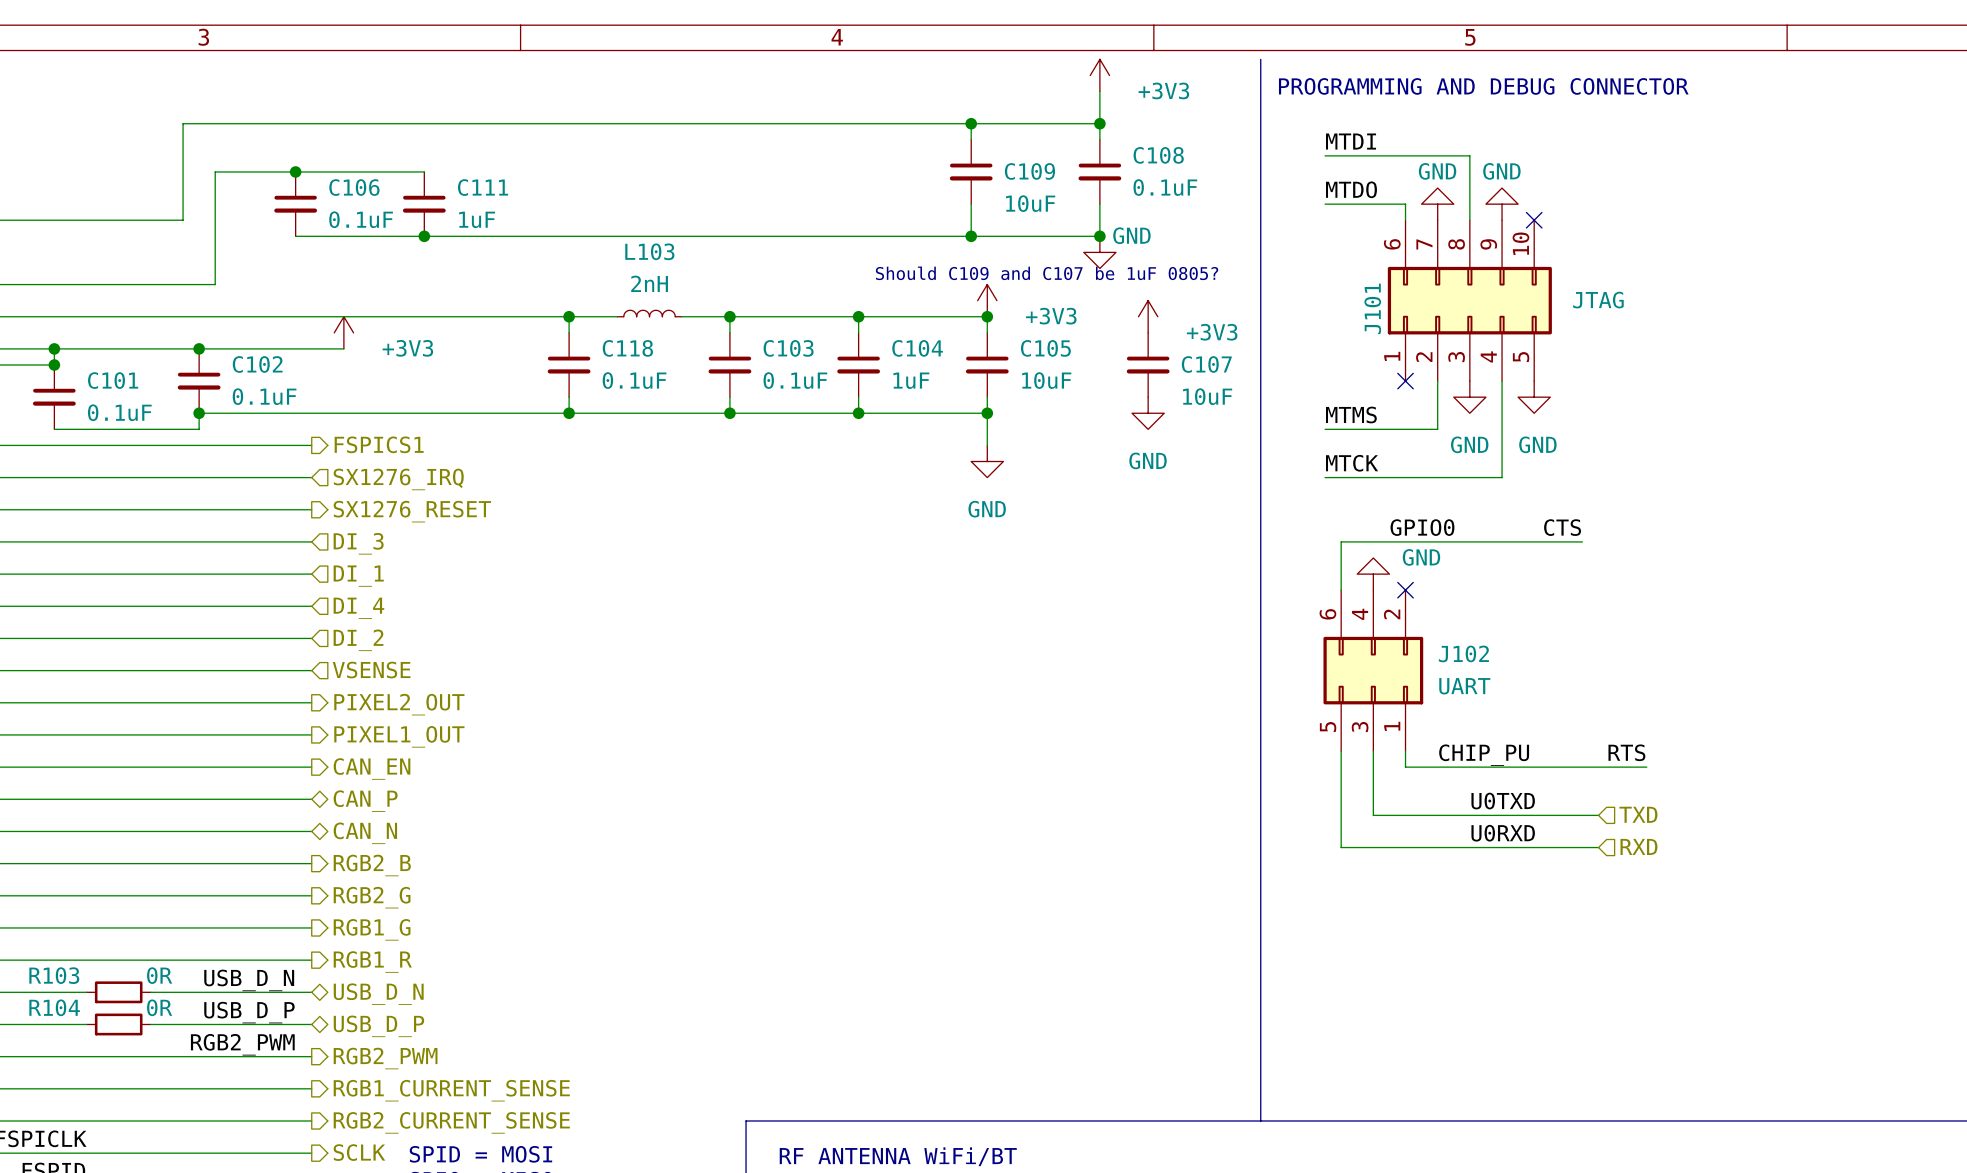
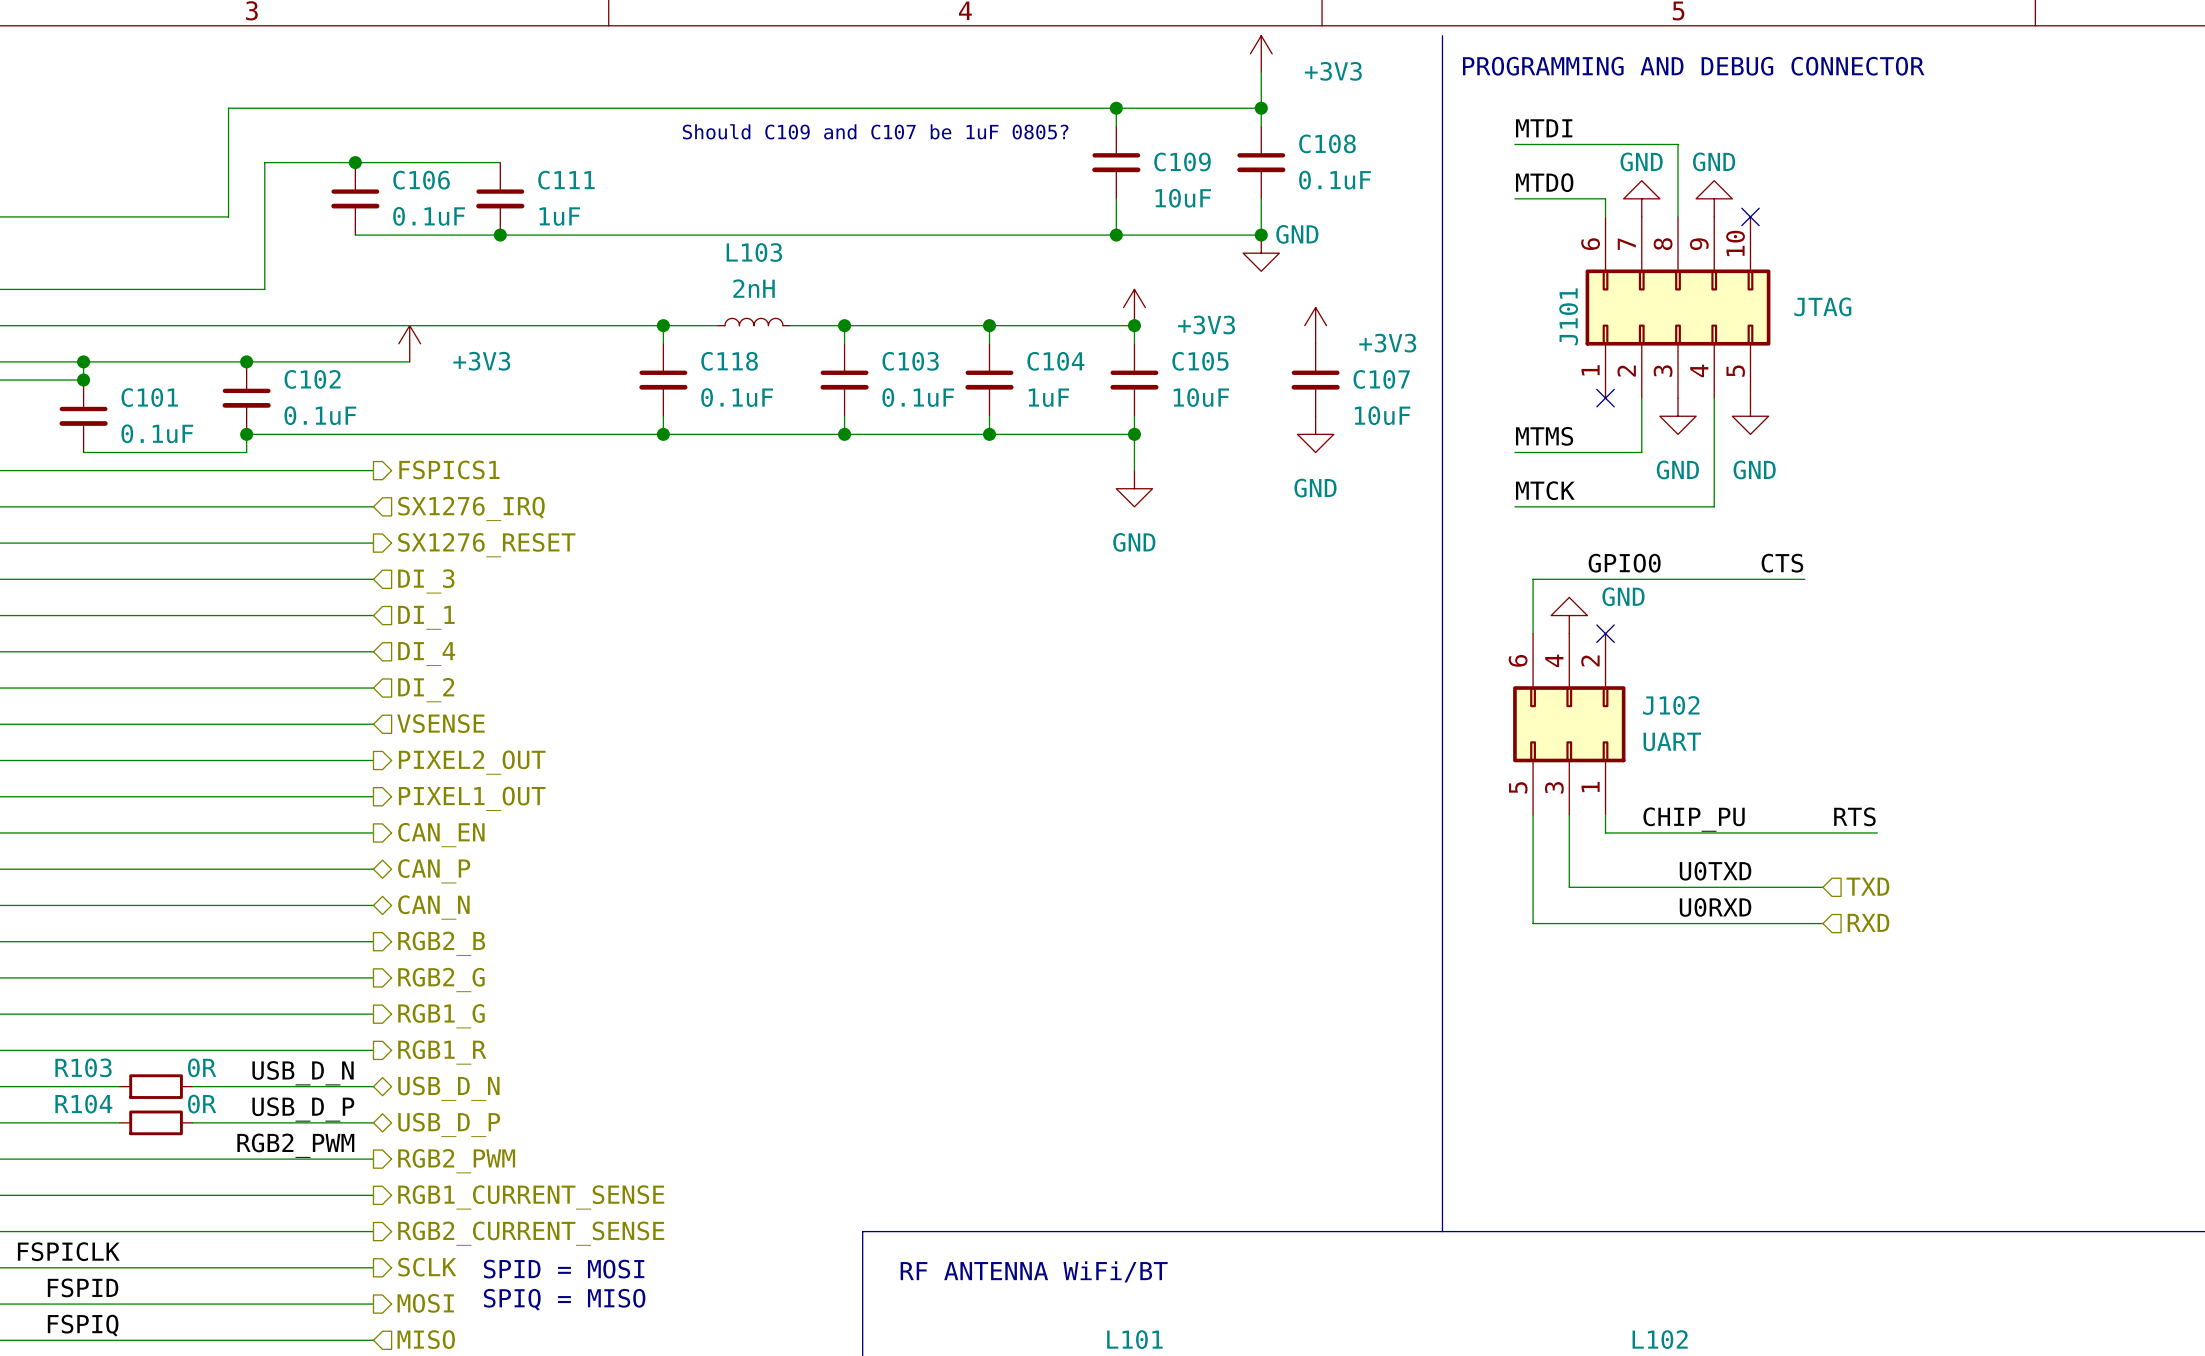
text: none -> Should C109 and C107 be 1uF 0805? (875, 131)
text: Should C109 and C107 be 1uF 0805? (1047, 273) -> none

